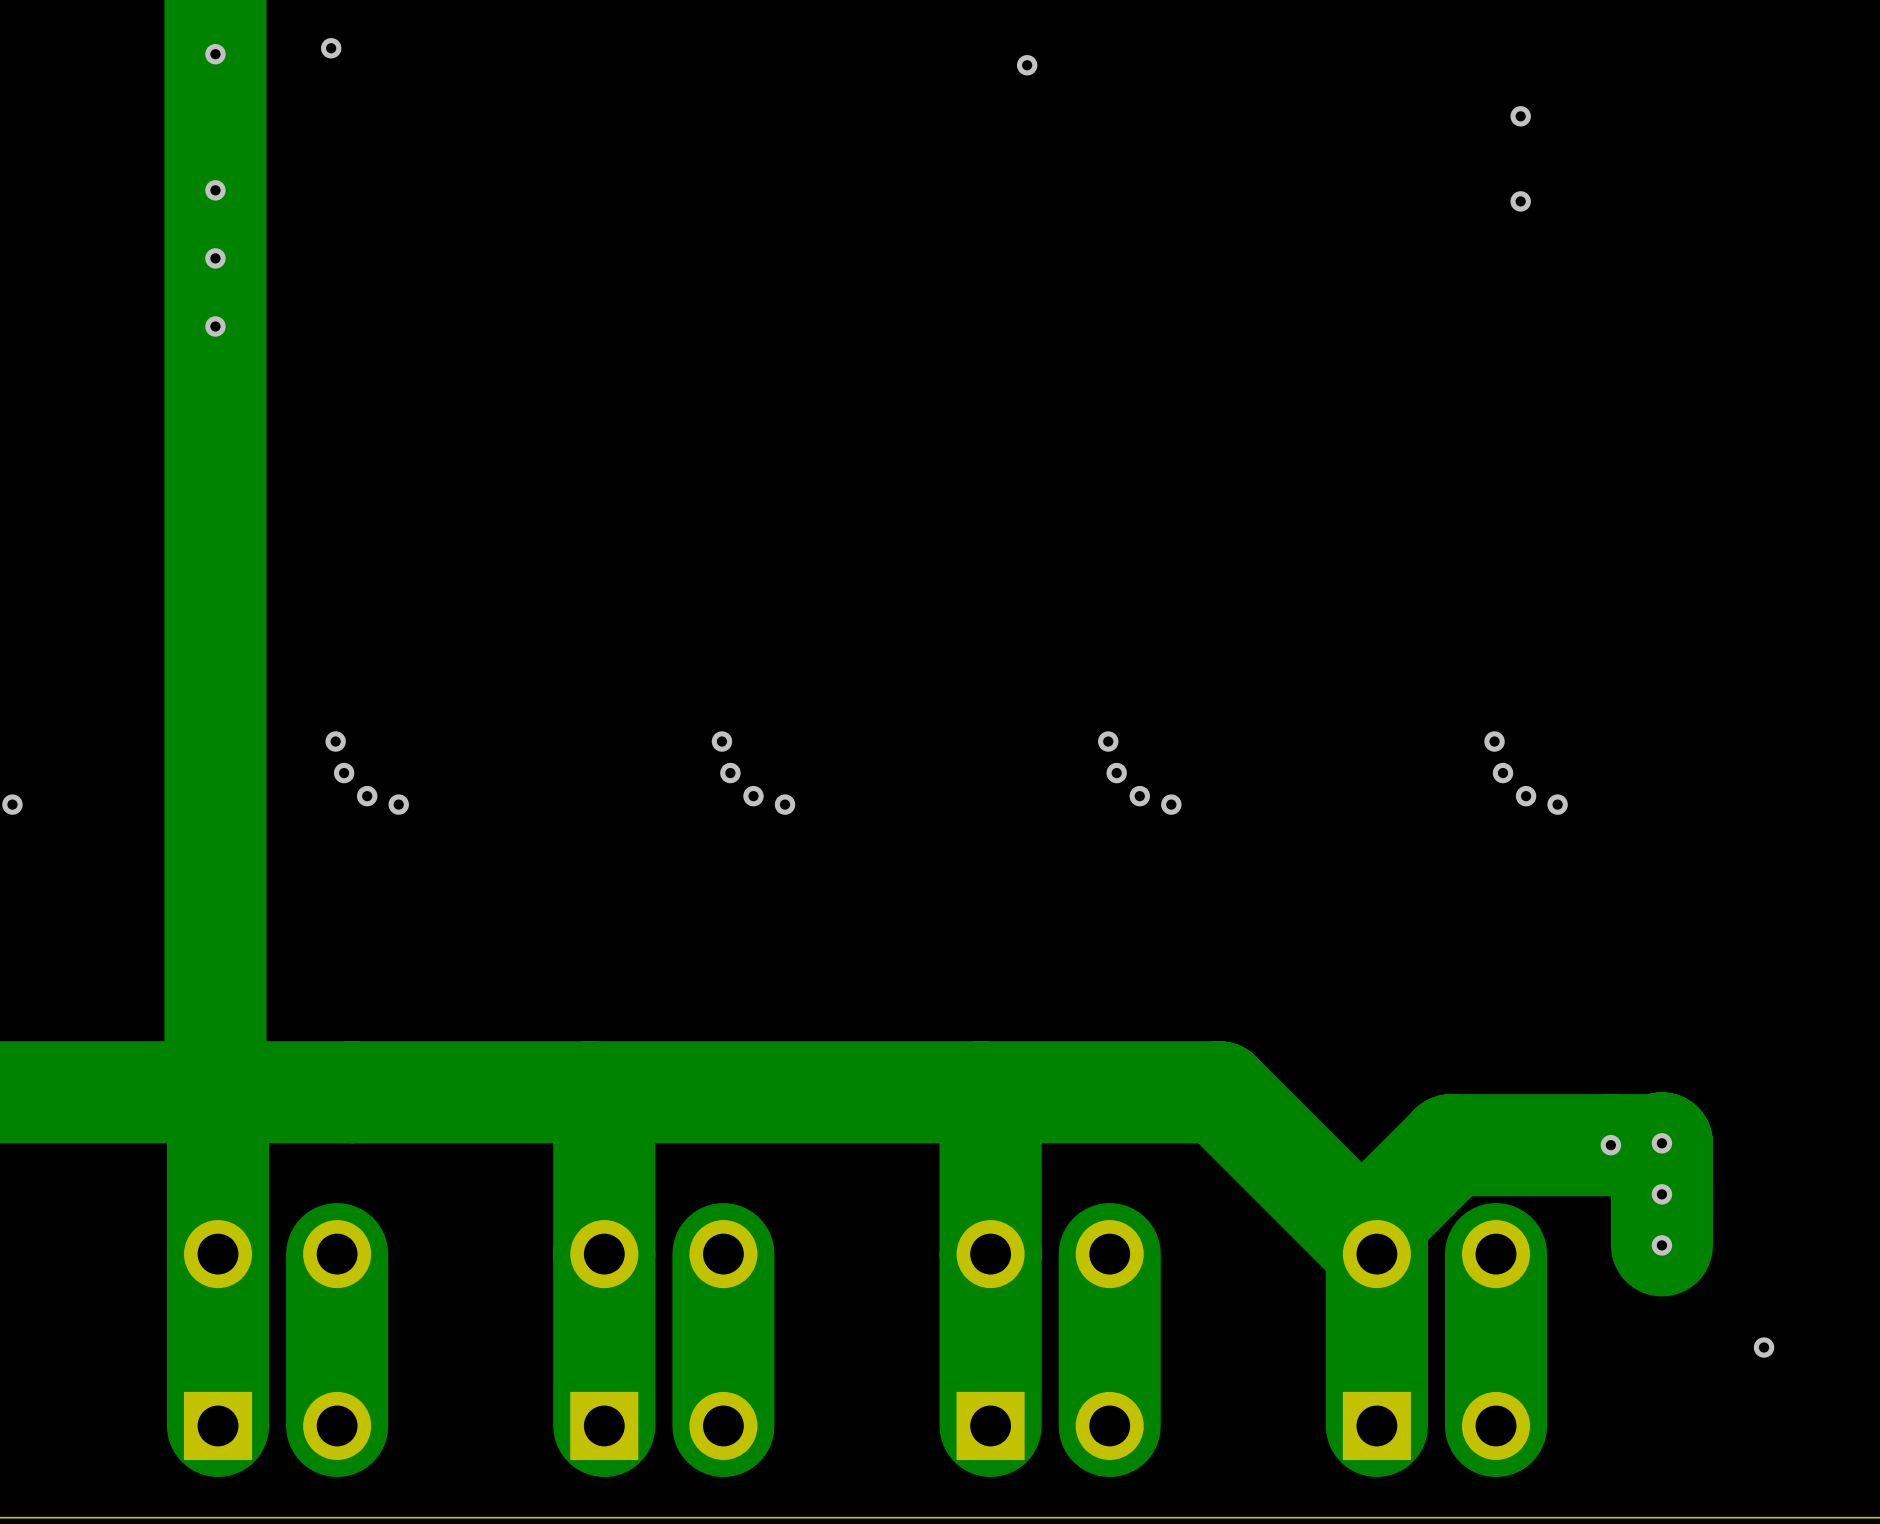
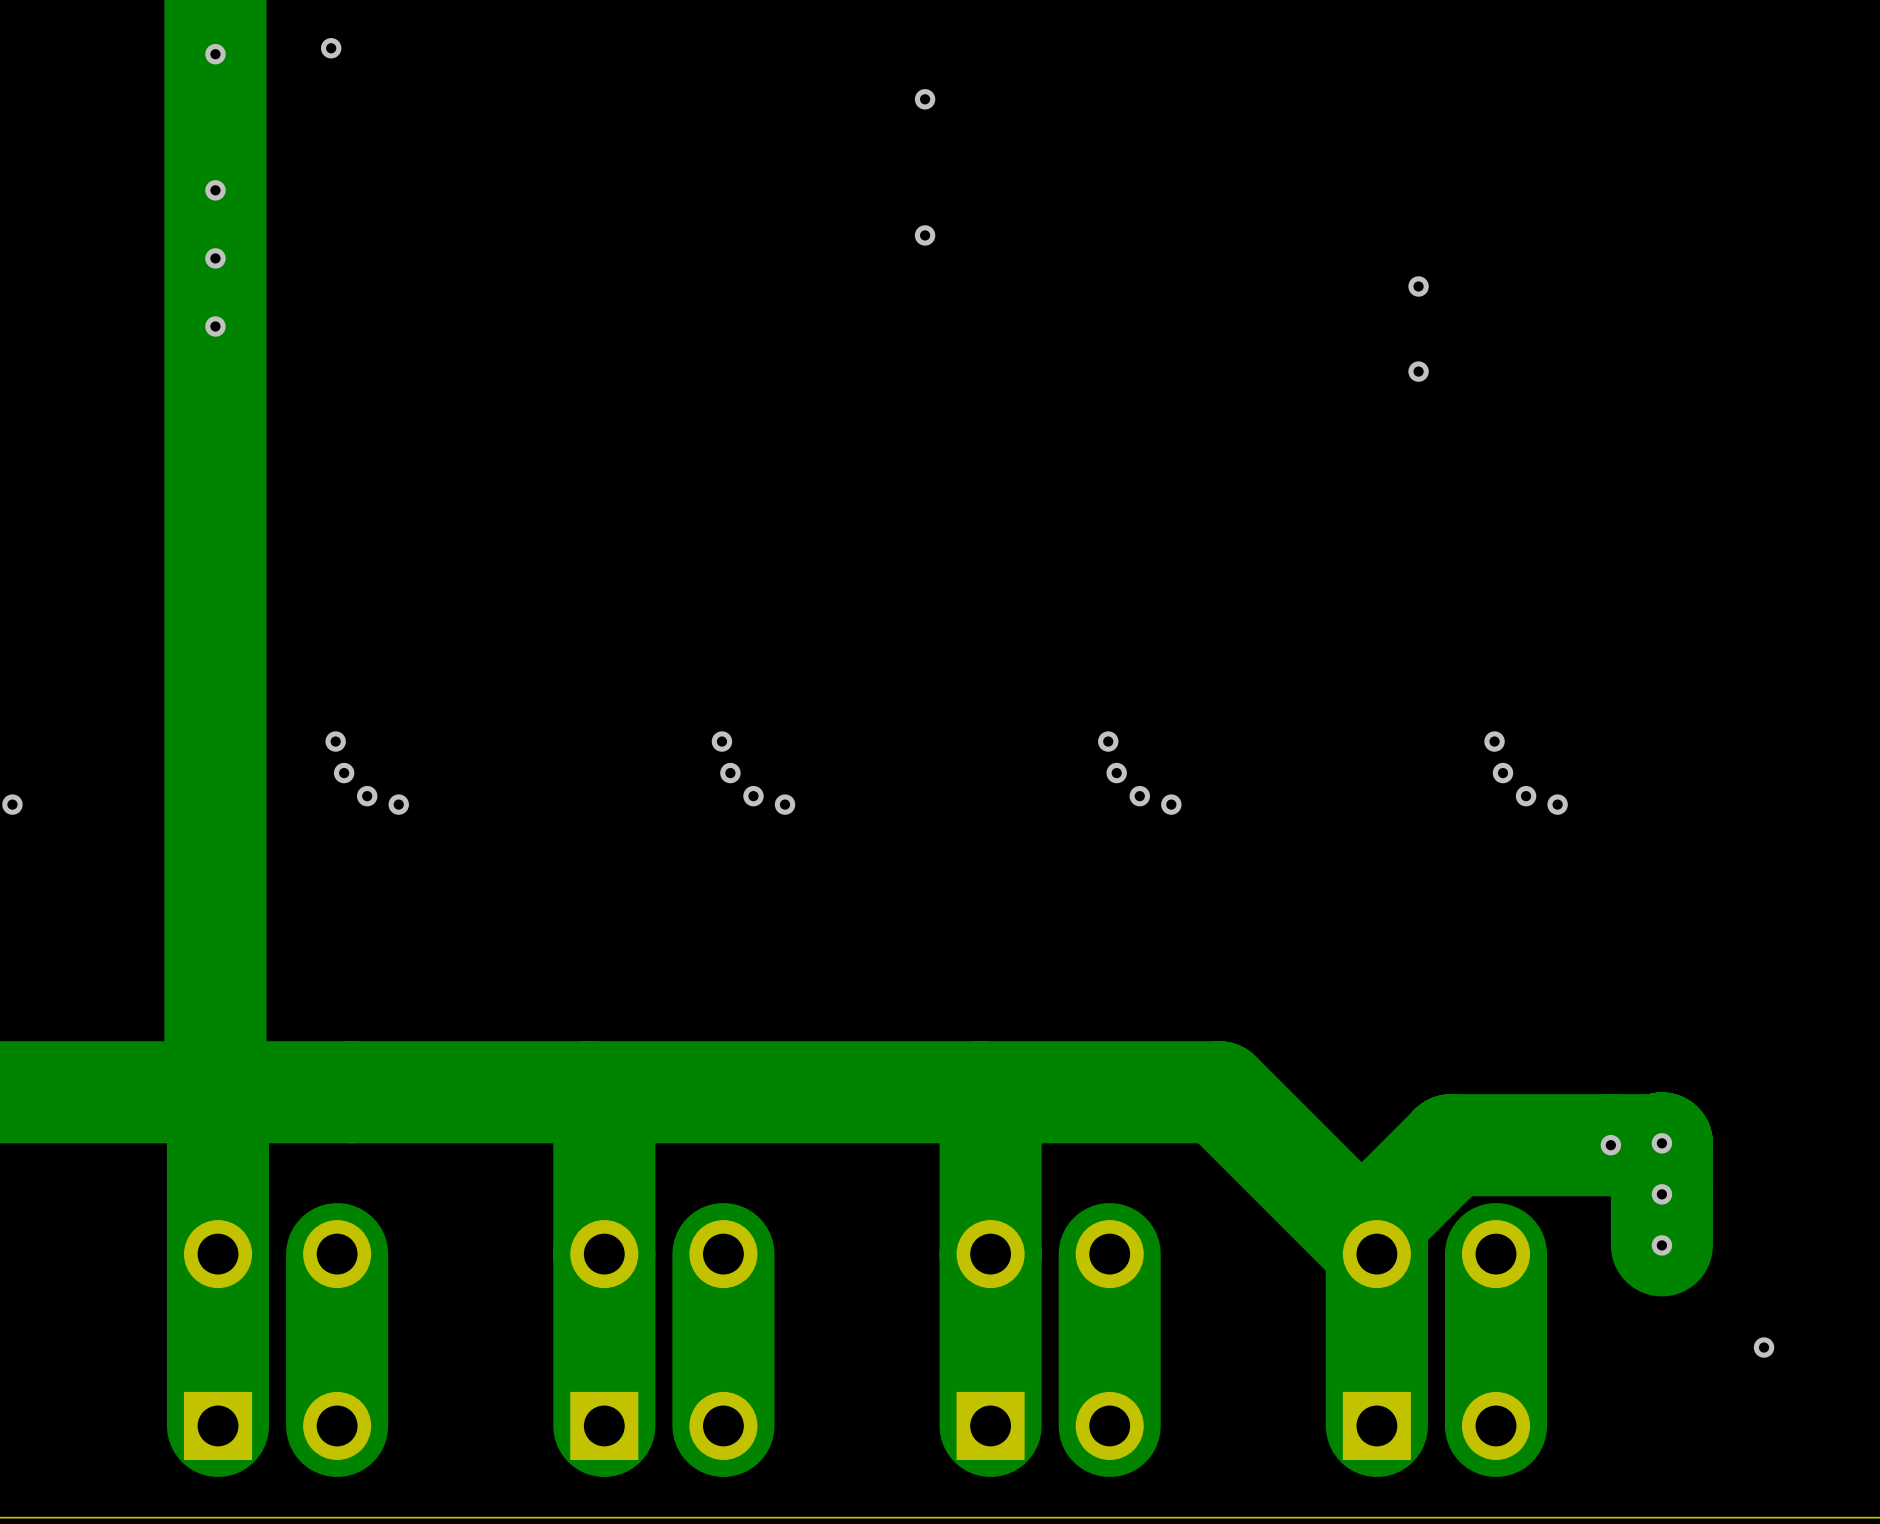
via: (1027, 65) -> none
via: none -> (925, 99)
via: (1520, 116) -> none
via: (1520, 201) -> none
via: none -> (925, 235)
via: none -> (1418, 286)
via: none -> (1418, 371)

